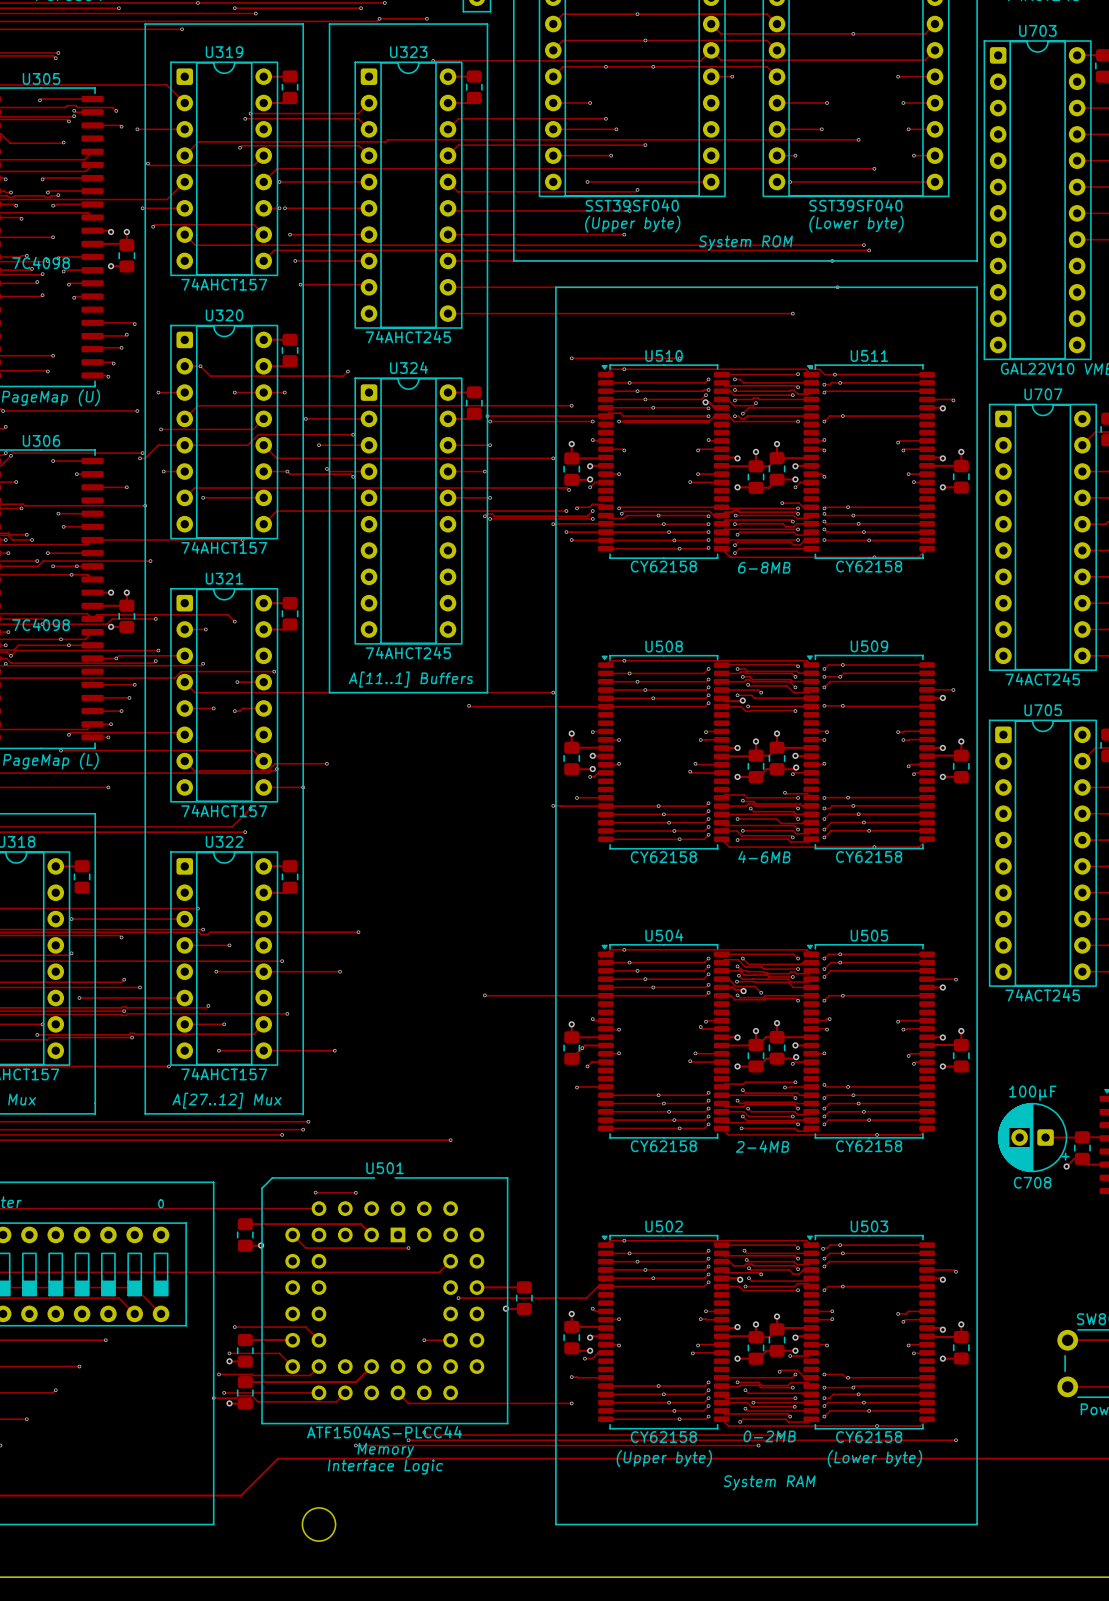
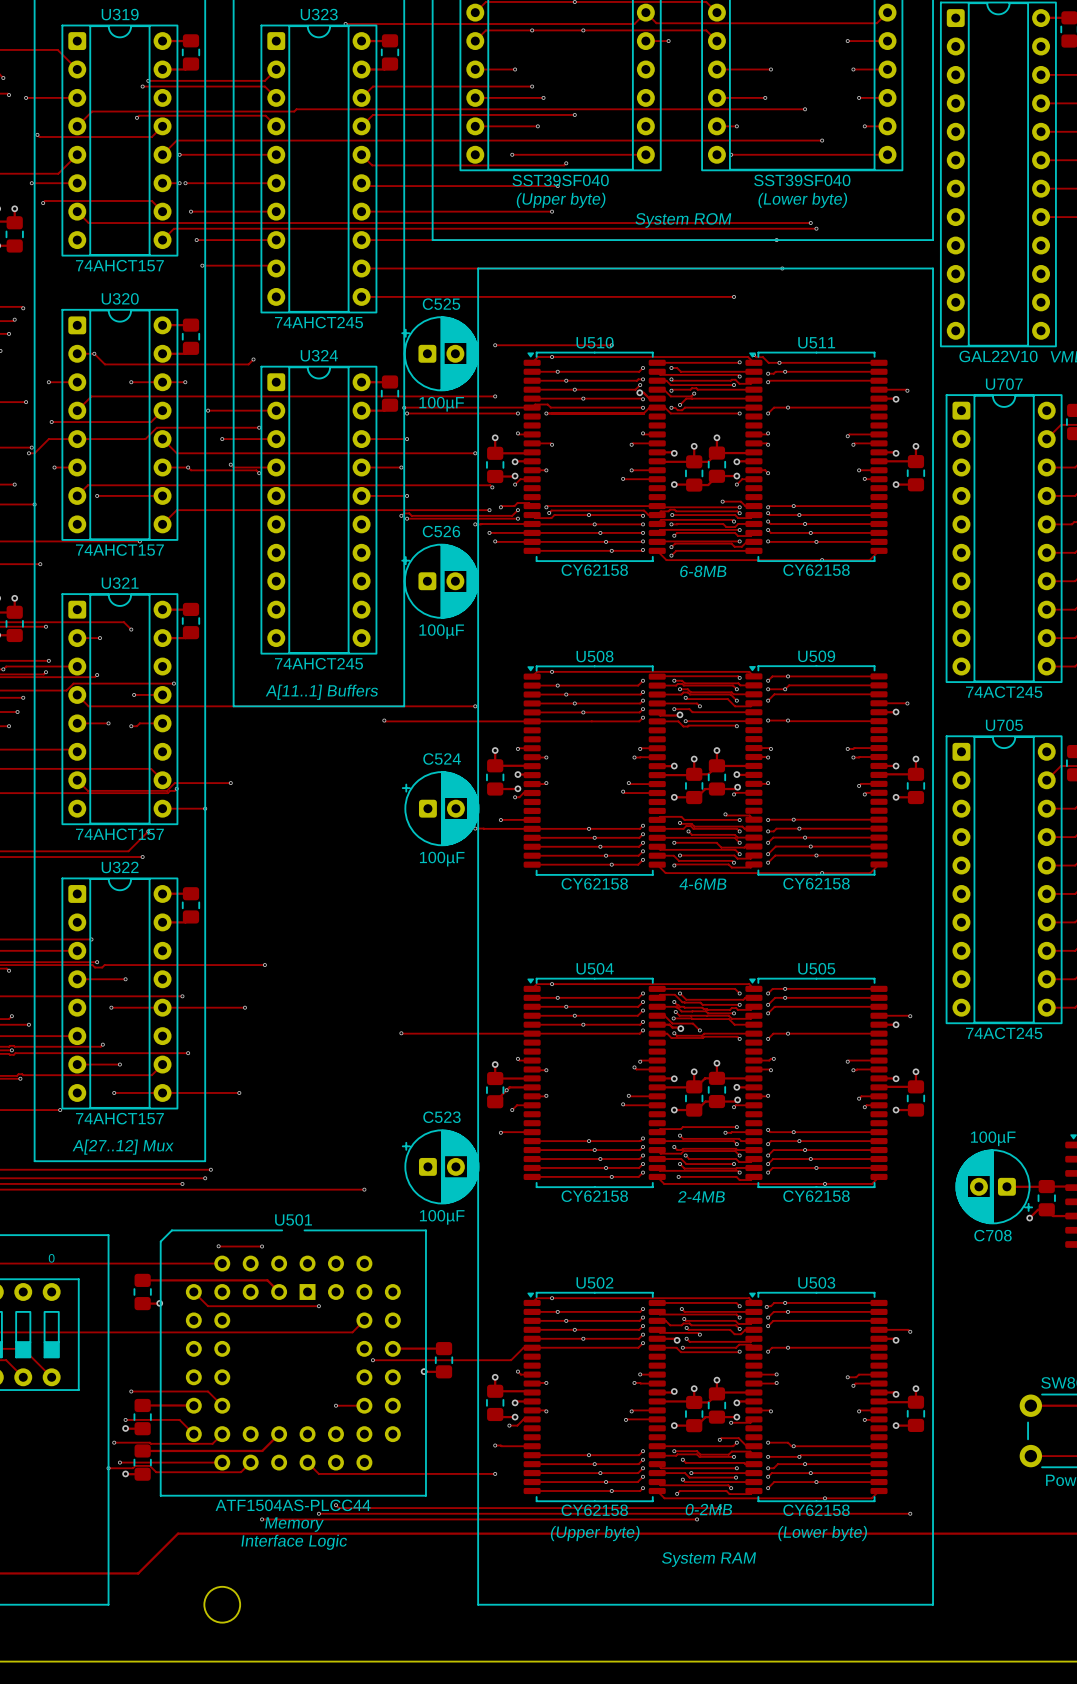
C525: none -> 100µF (440, 353)
C526: none -> 100µF (440, 581)
C524: none -> 100µF (440, 808)
C523: none -> 100µF (440, 1166)

